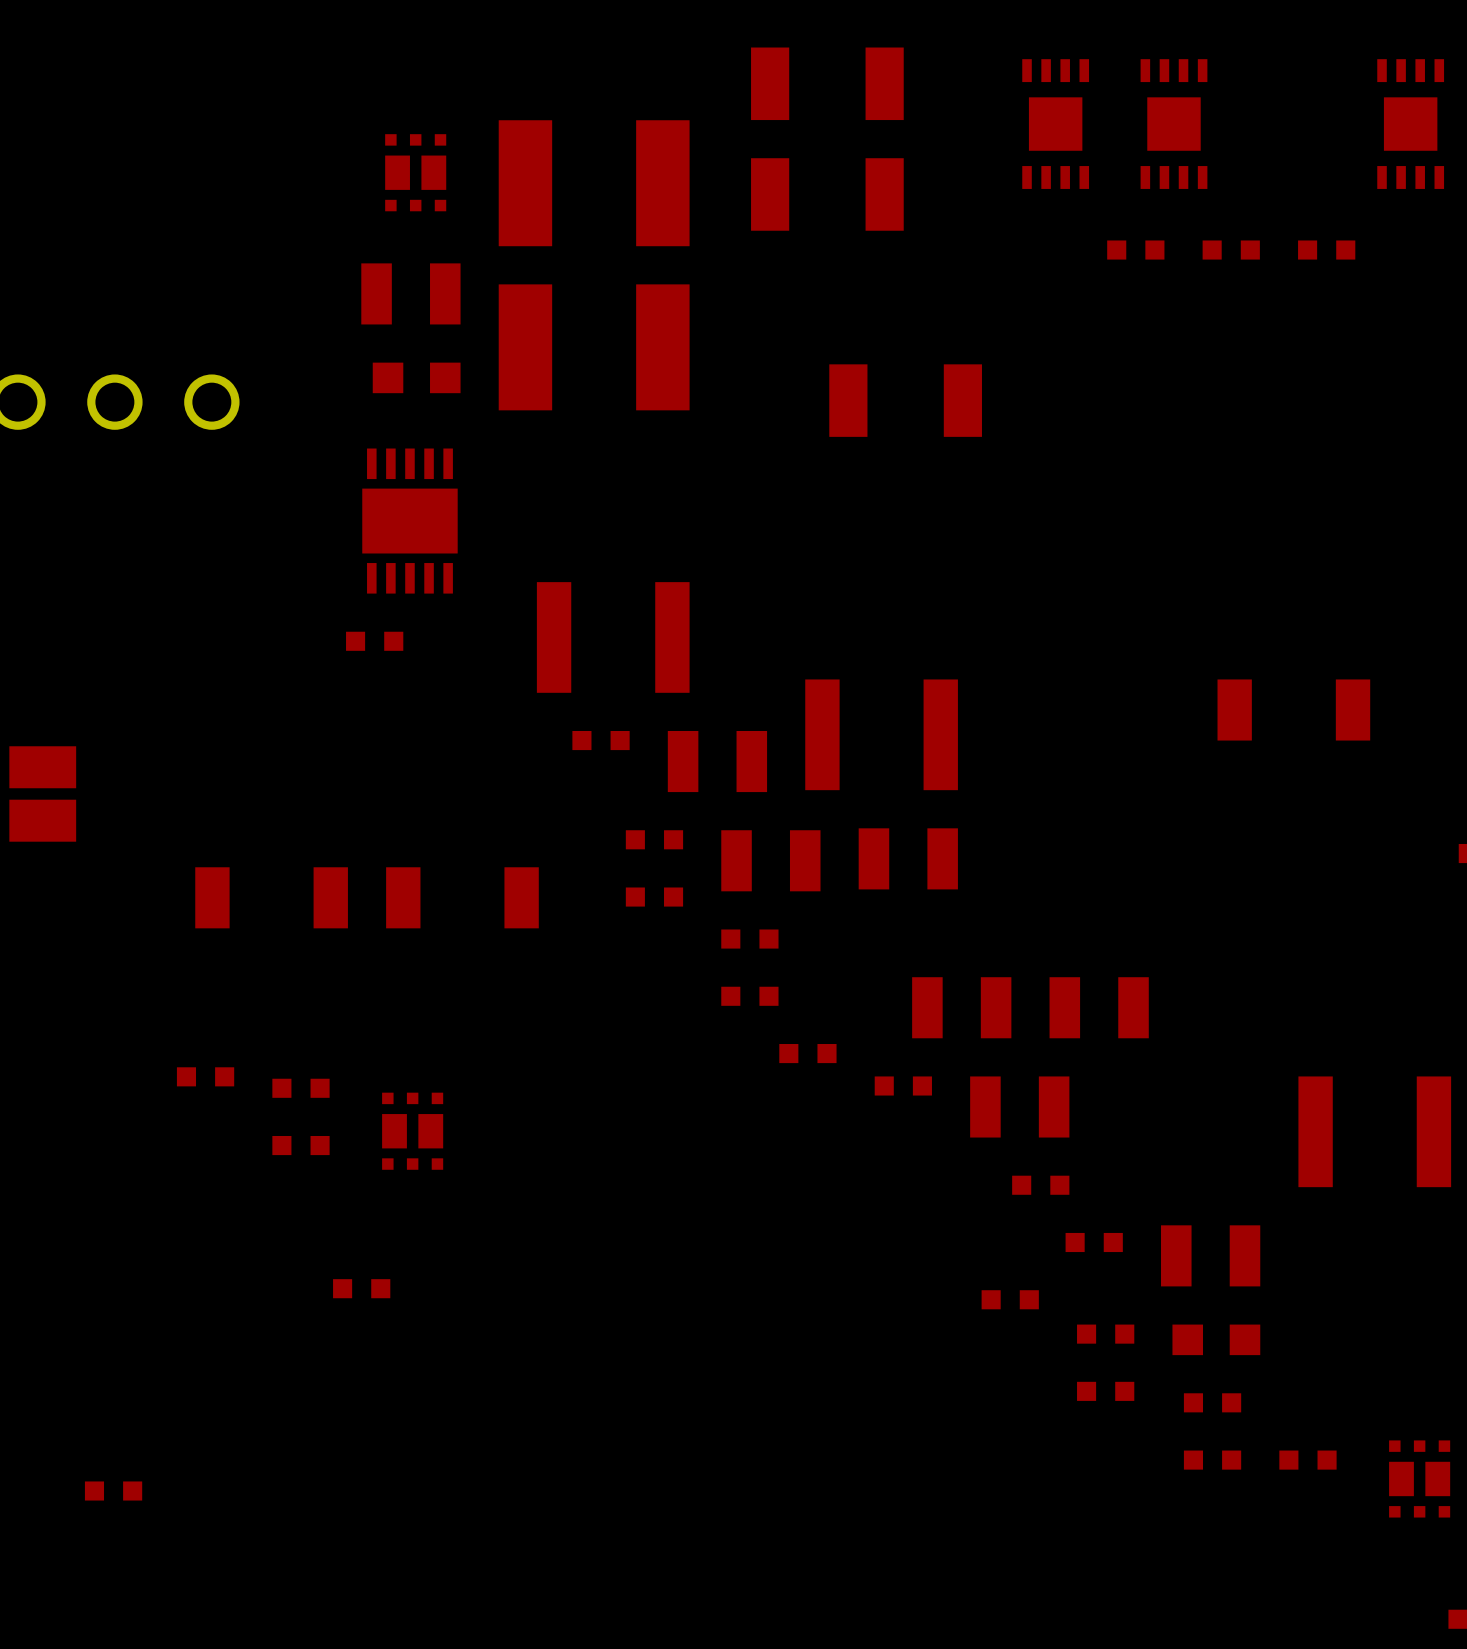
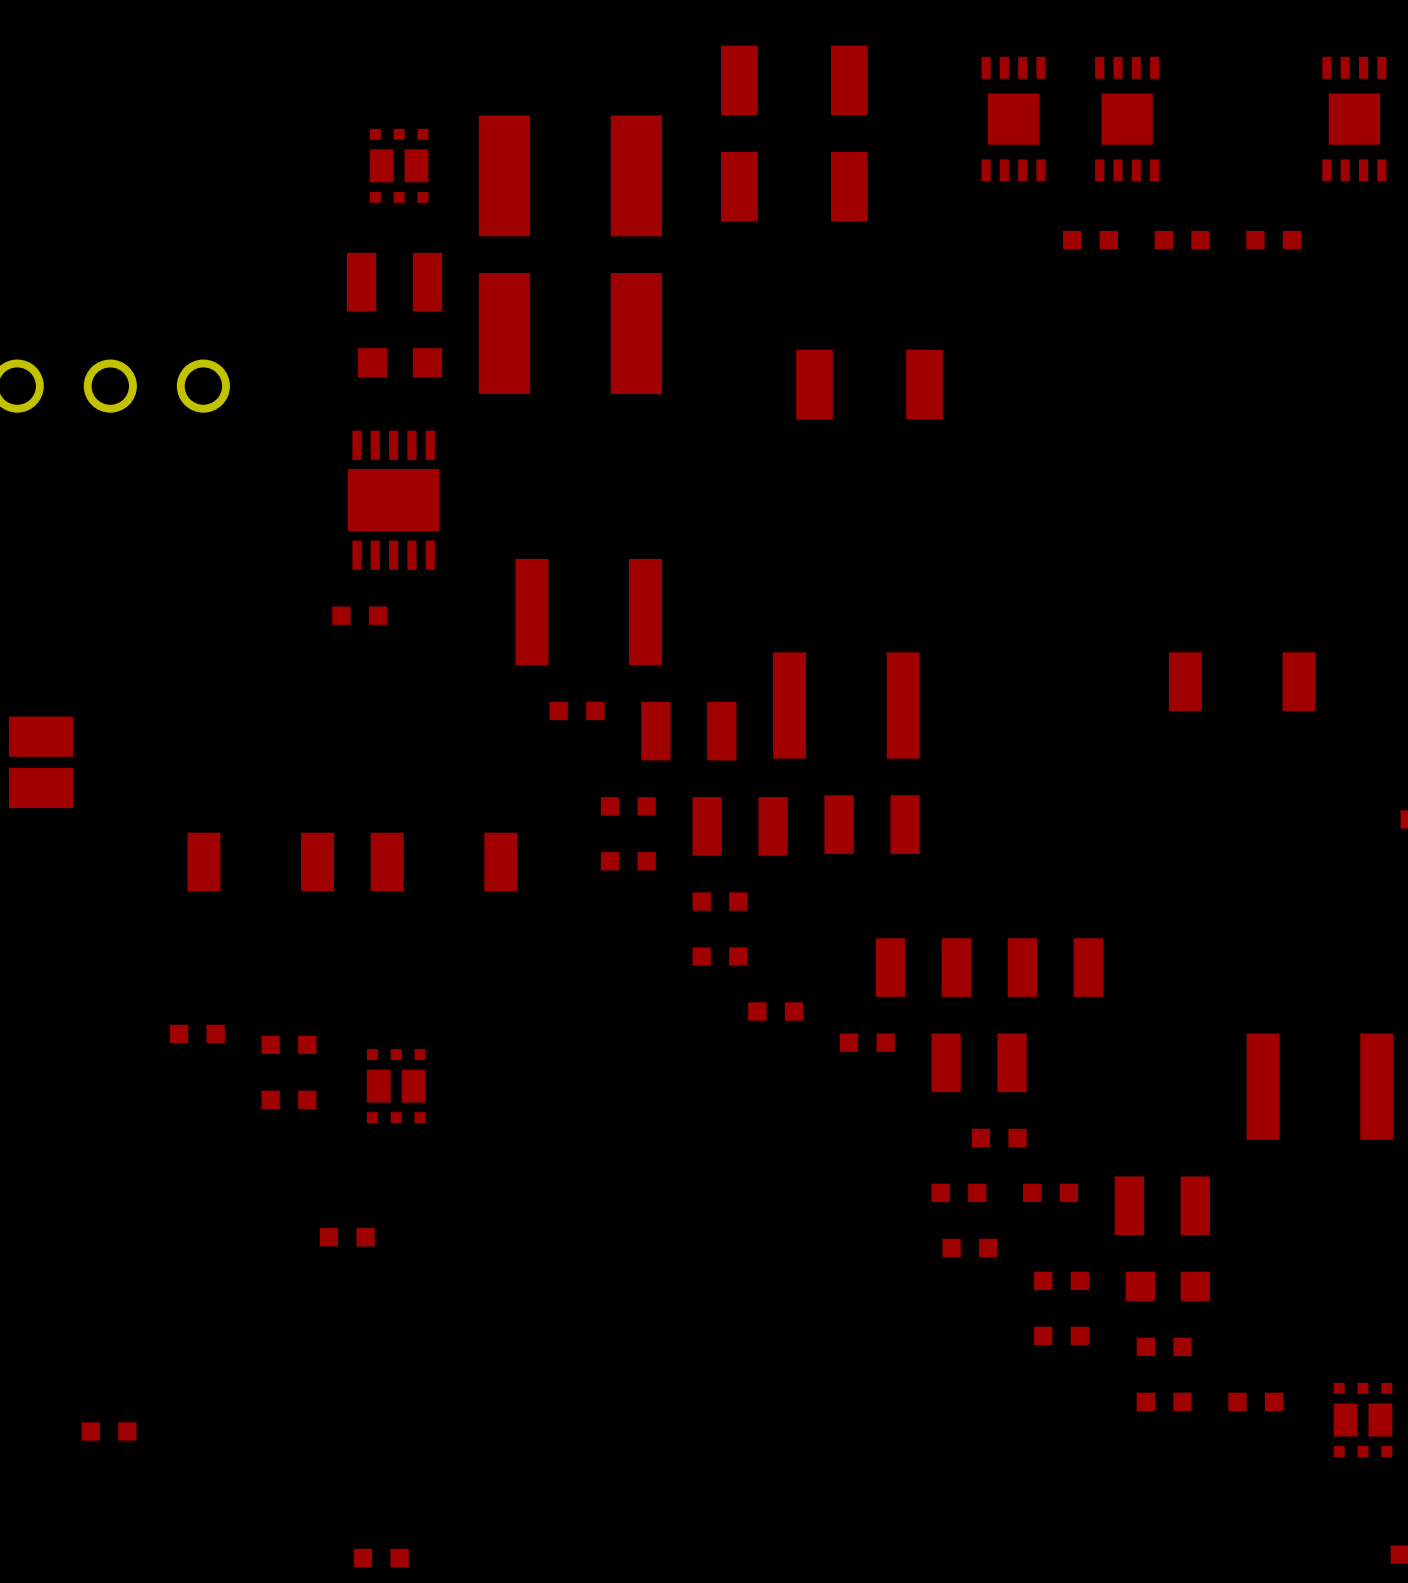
part: none -> (958, 1192)
part: none -> (381, 1557)

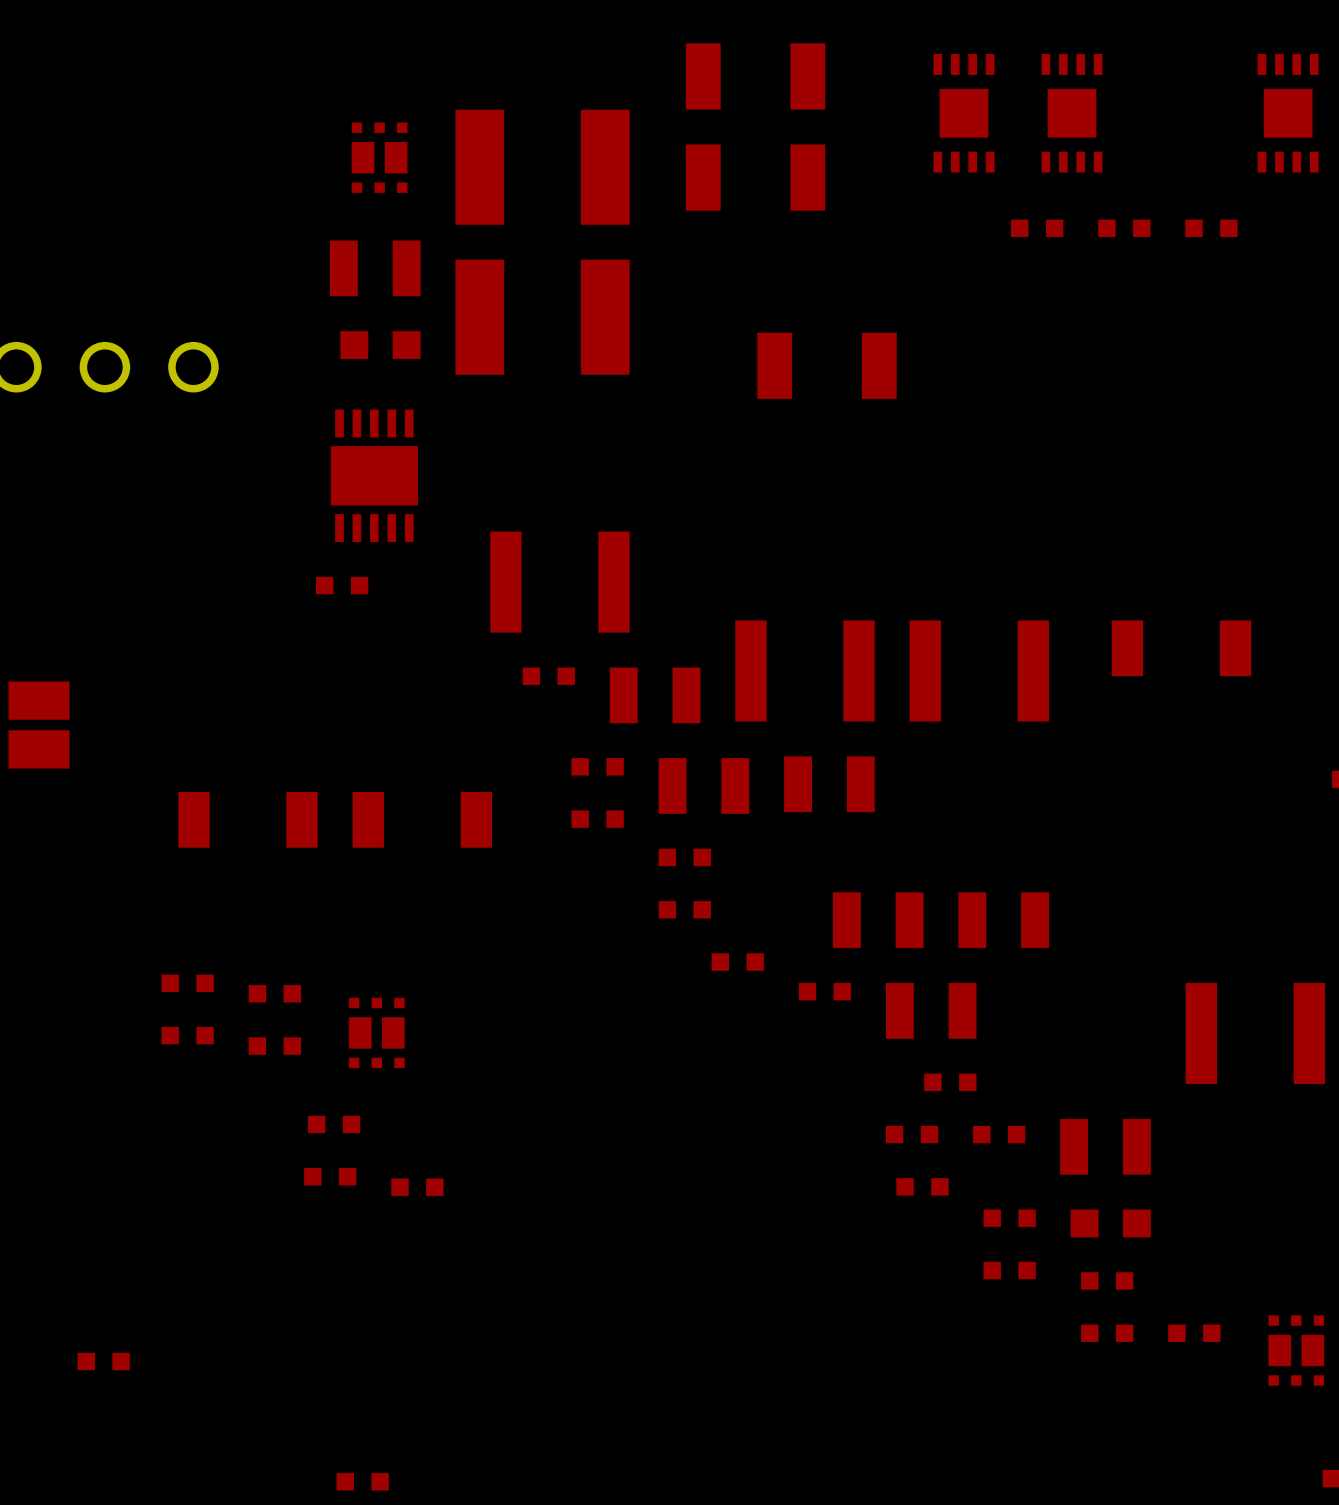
part: none -> (979, 670)
part: none -> (187, 1035)
part: none -> (334, 1124)
part: none -> (417, 1187)

